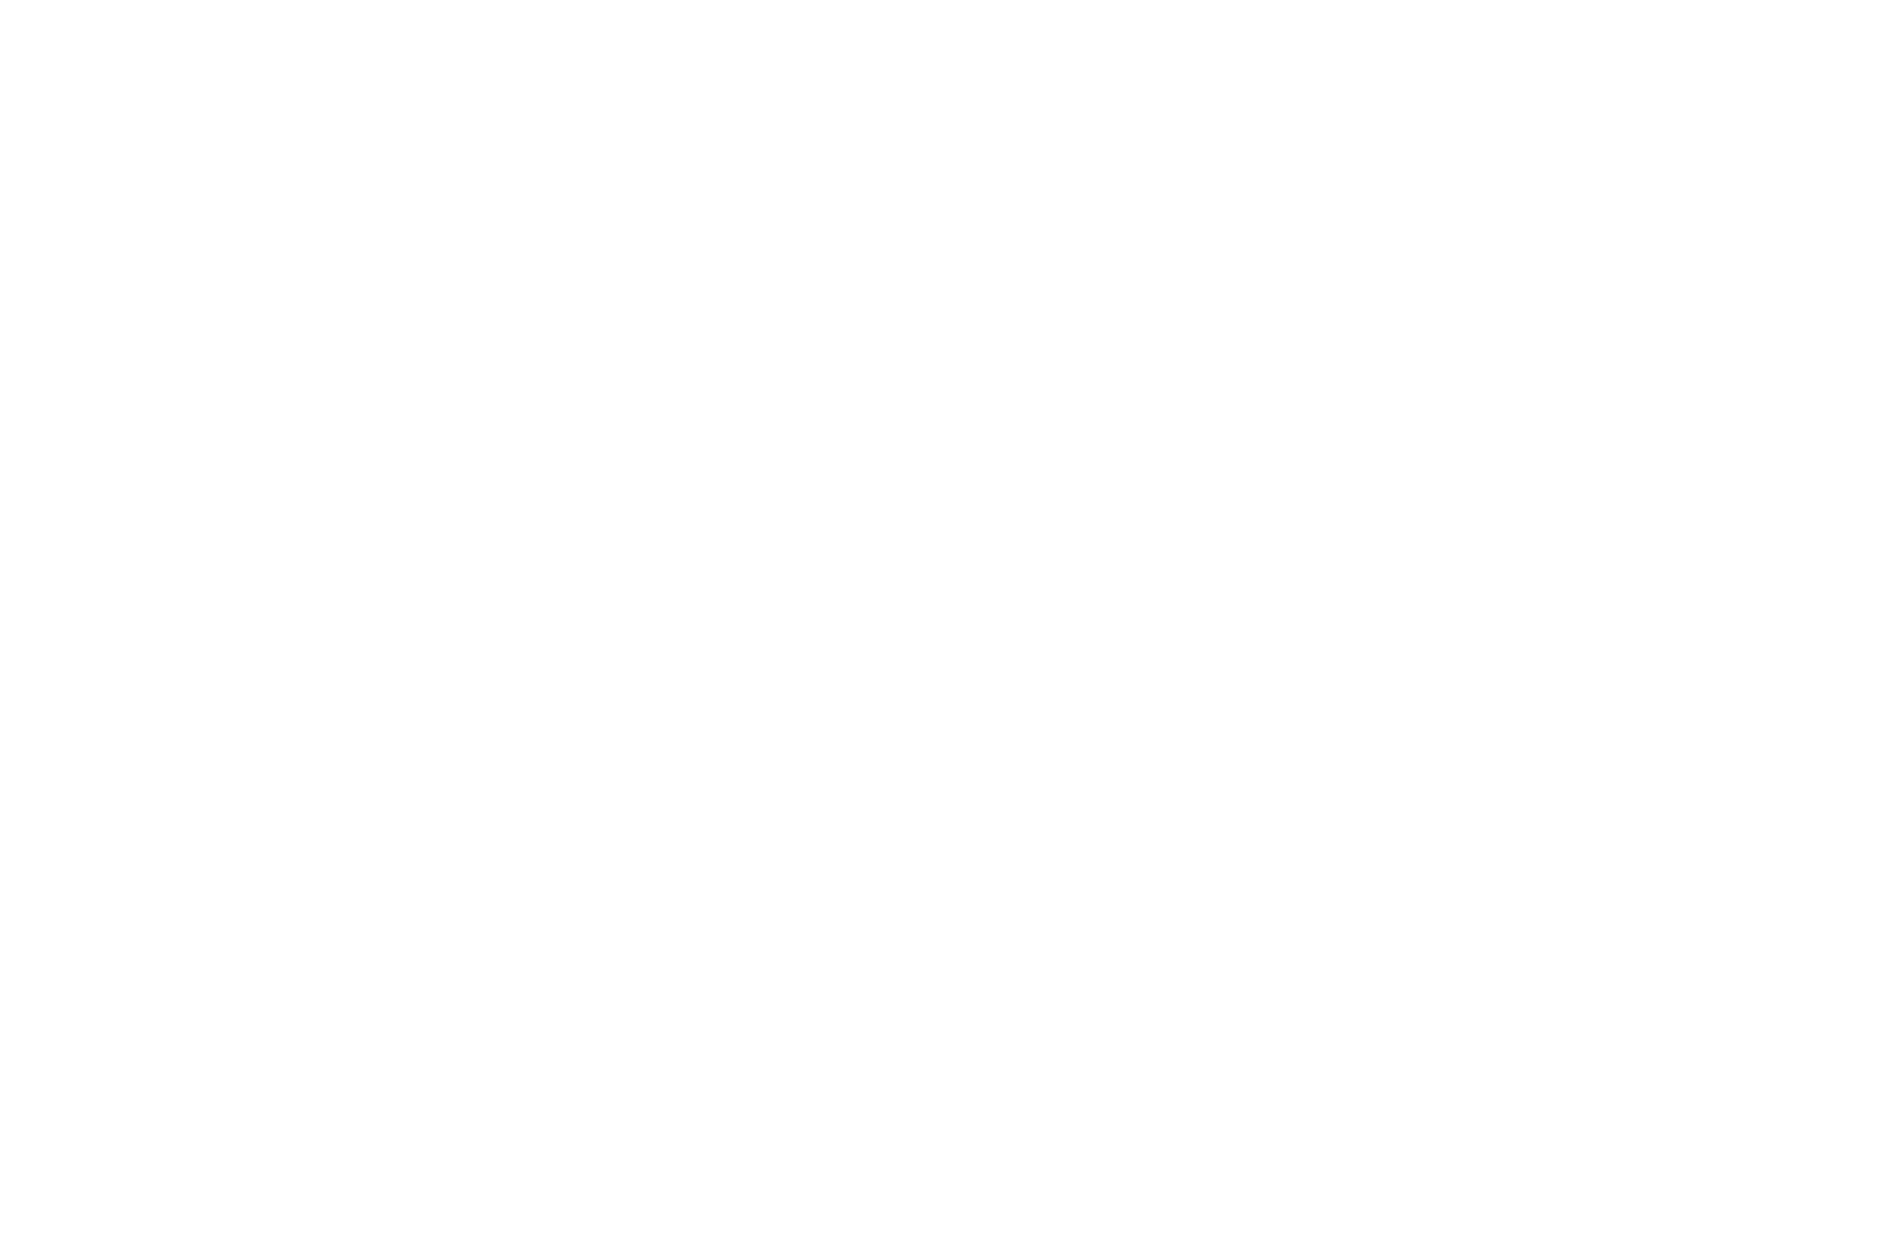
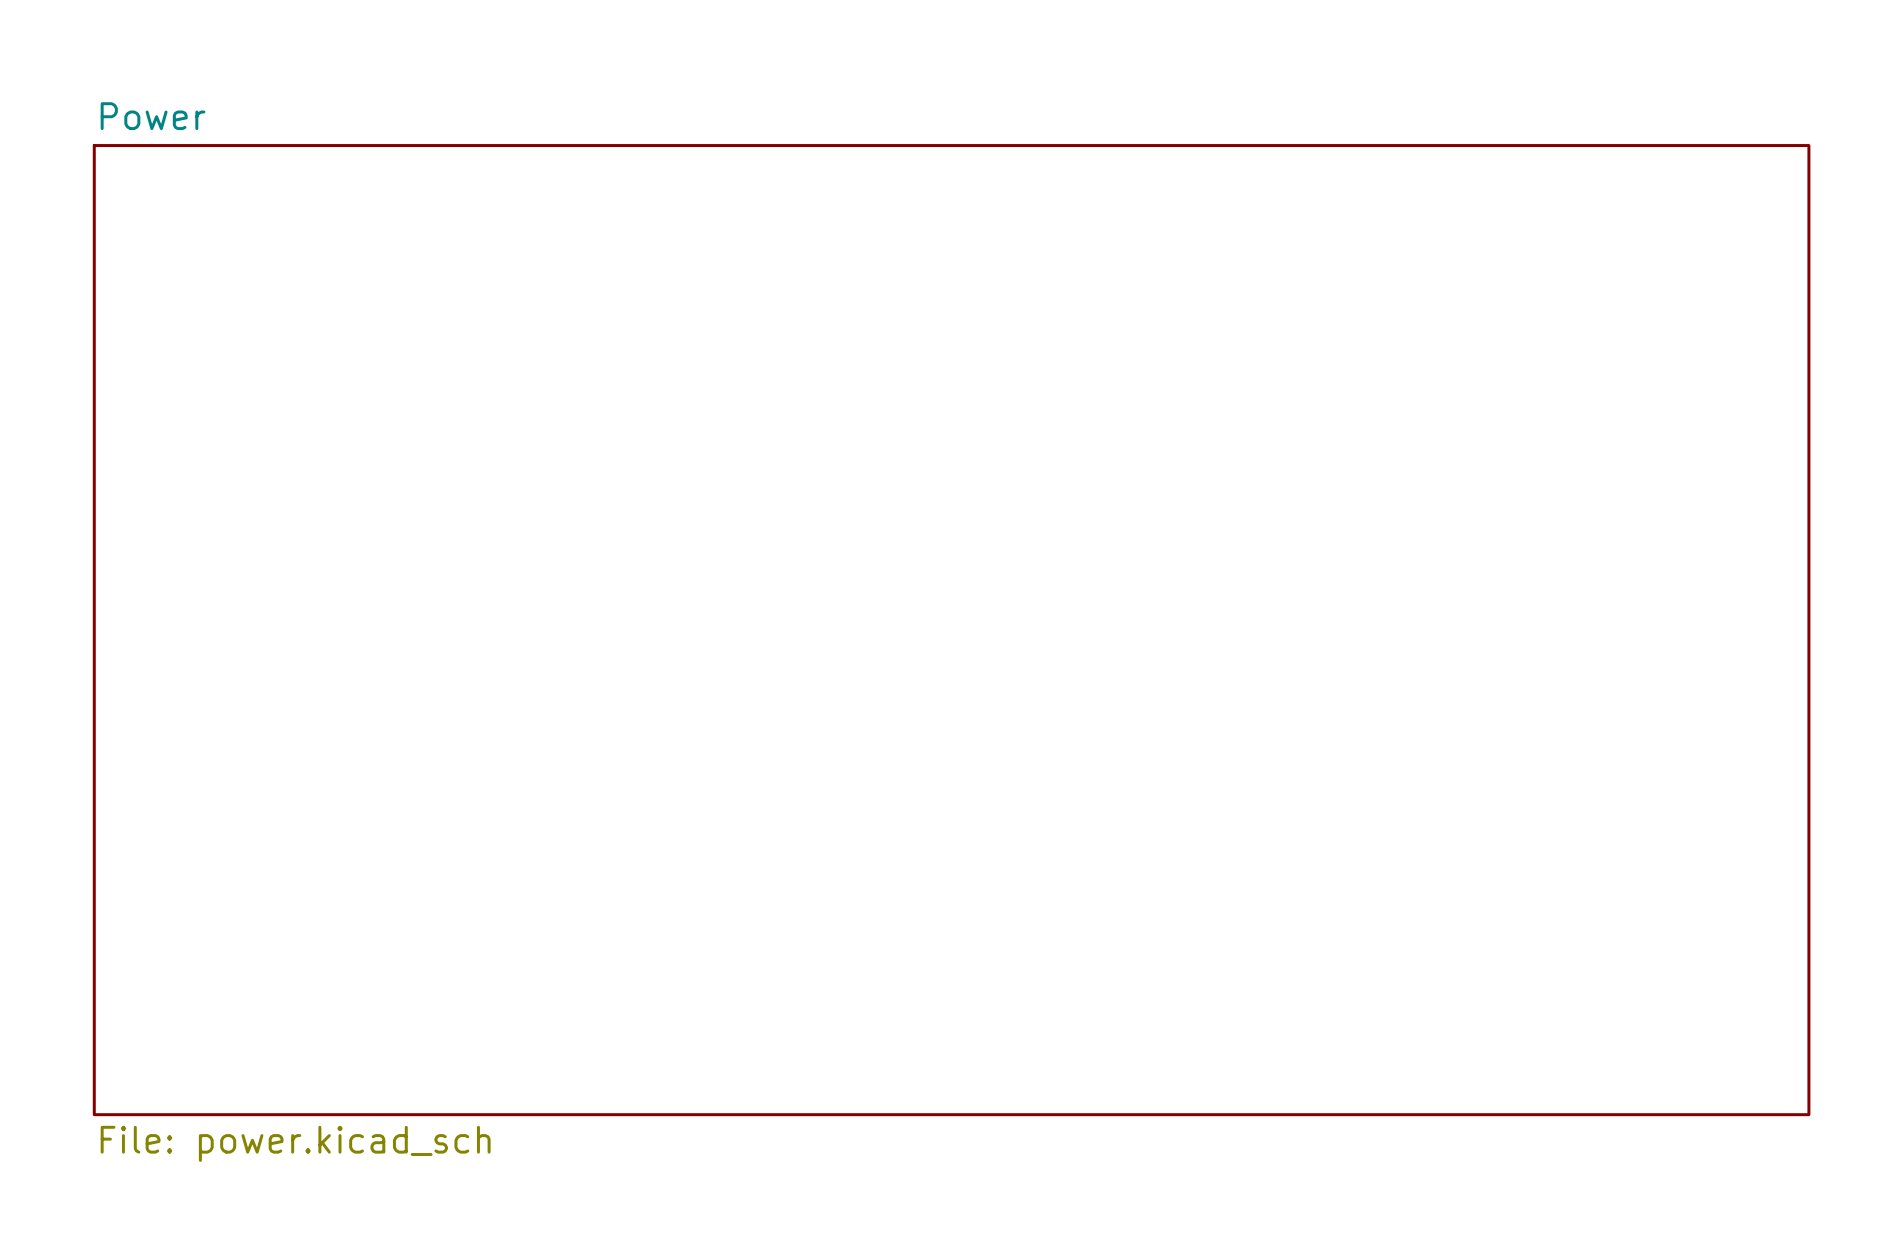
sheet Power: none -> File: power.kicad_sch (951, 630)

